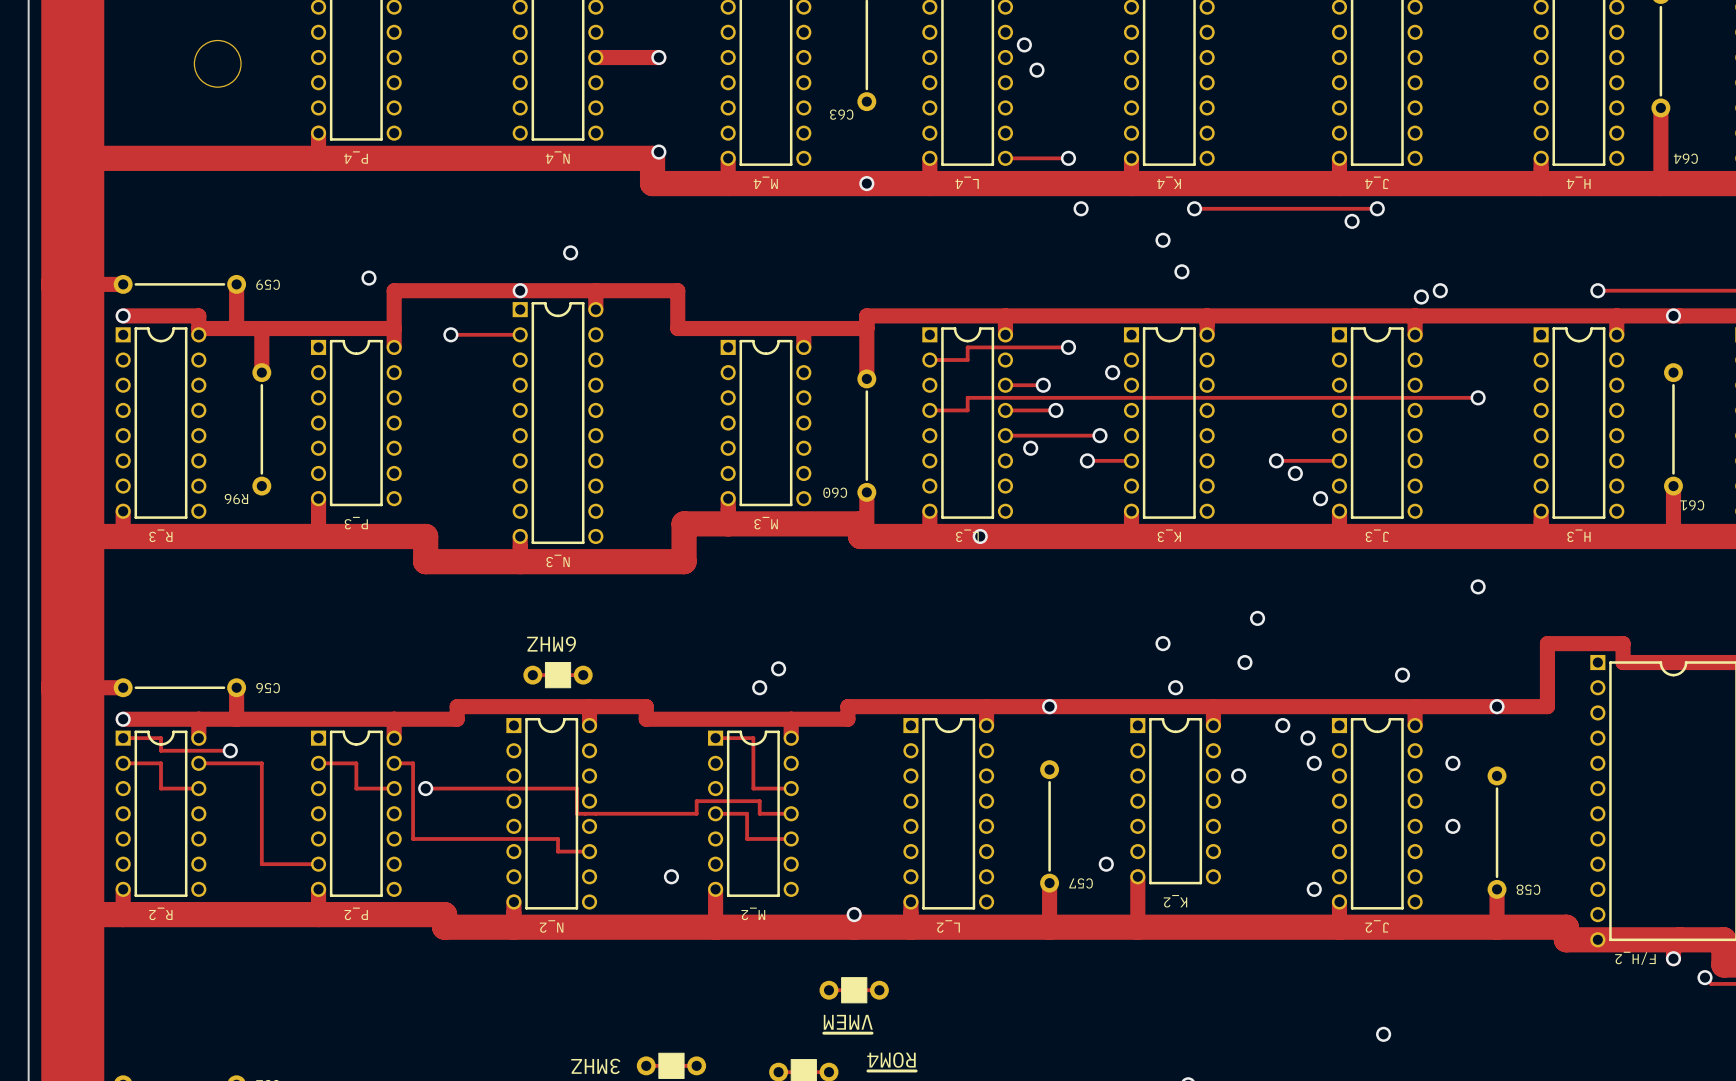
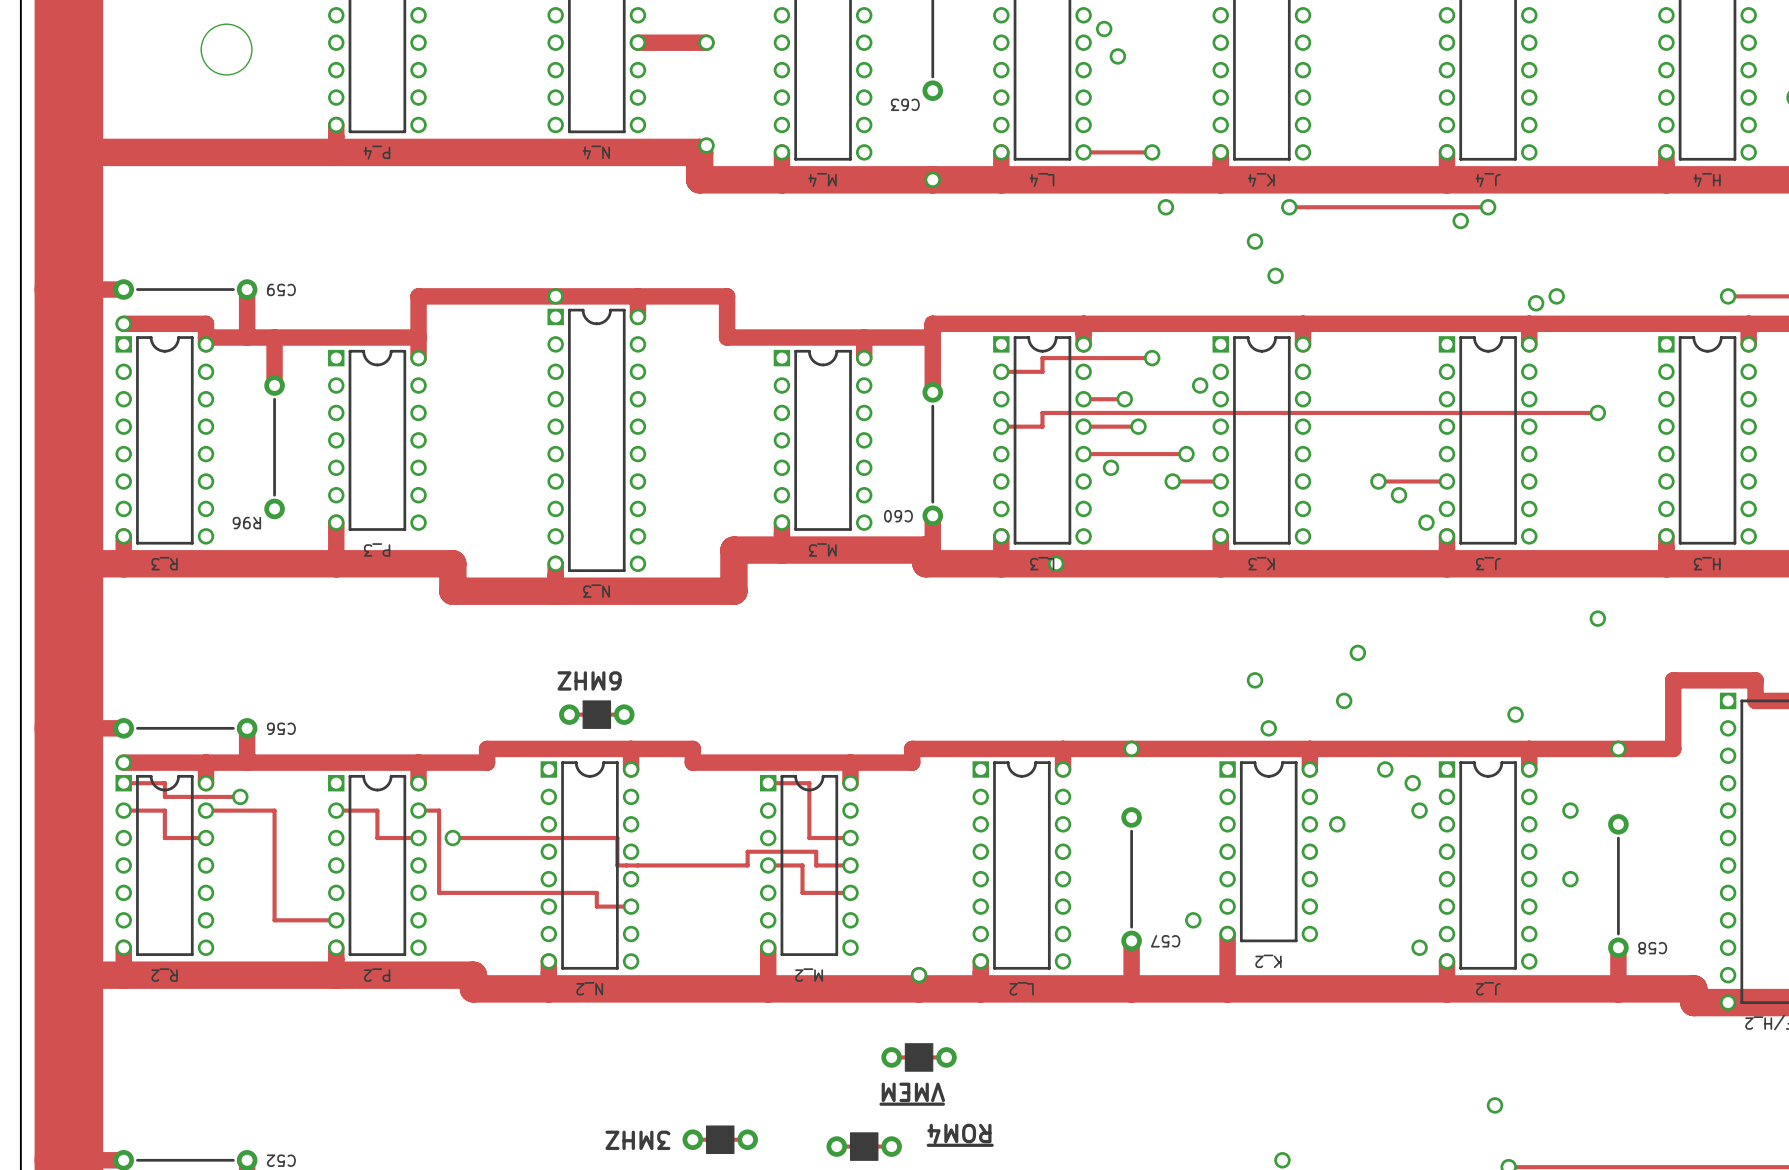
via: (570, 252) -> none
via: (368, 278) -> none
track: (450, 334) (520, 334) -> none
via: (450, 334) -> none
via: (778, 668) -> none
via: (759, 687) -> none
via: (671, 876) -> none

